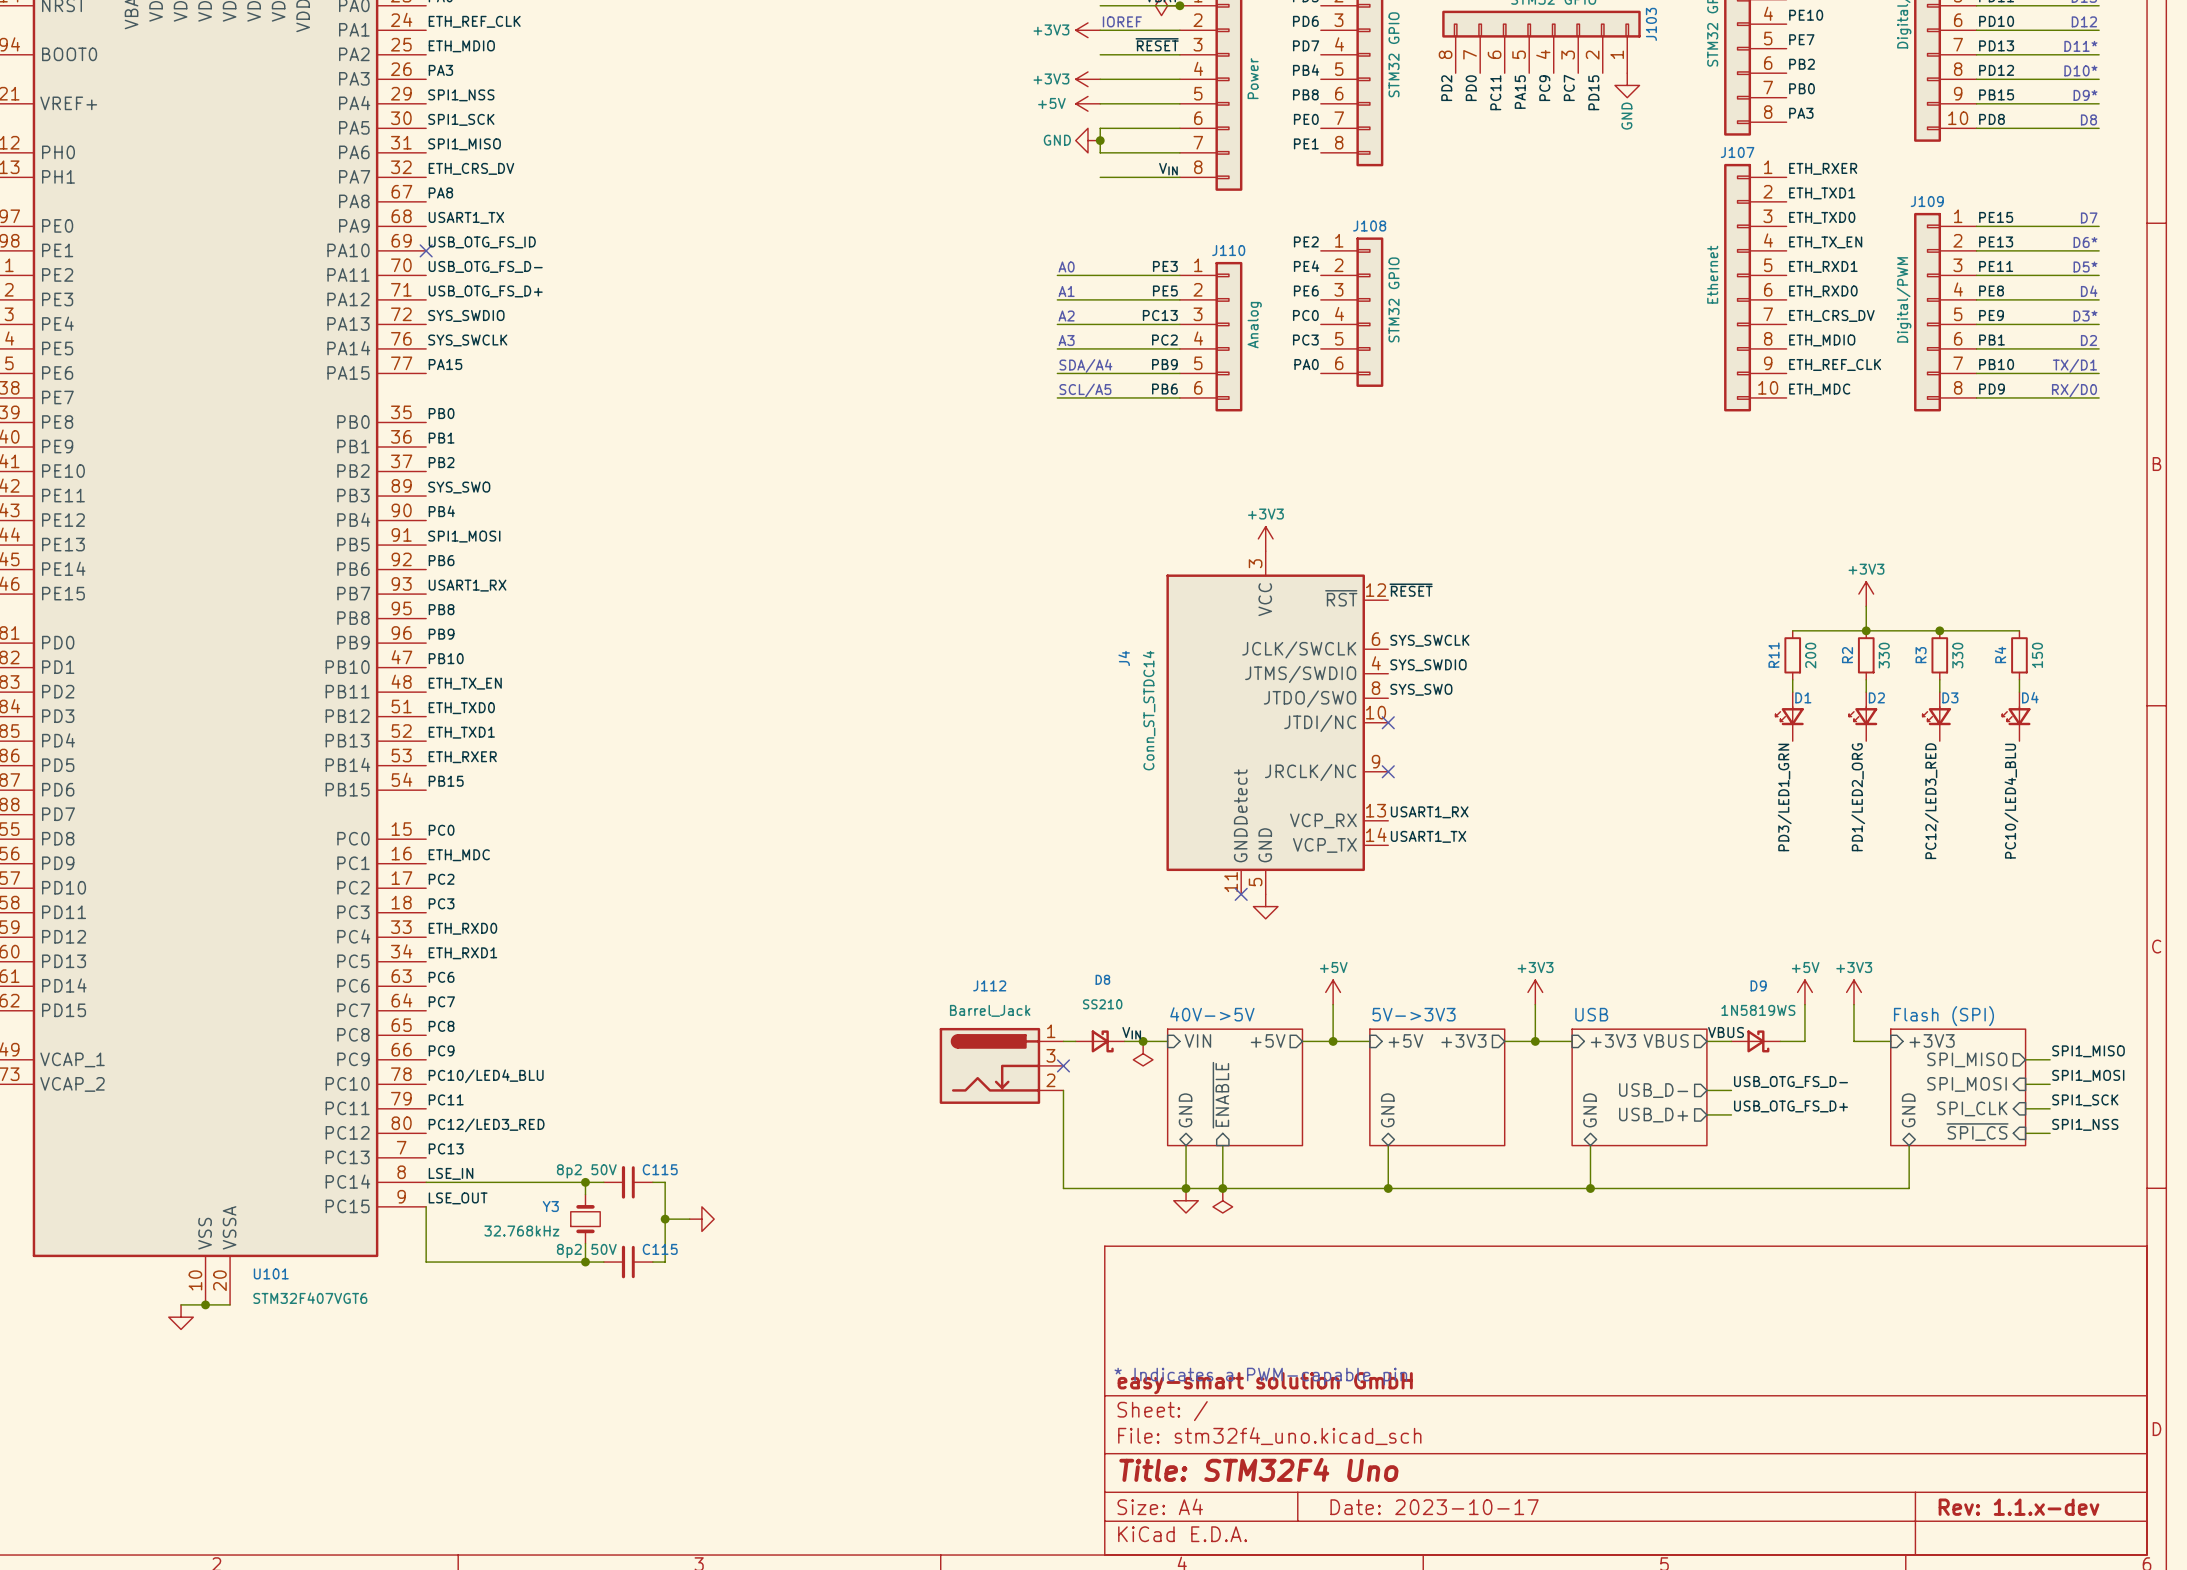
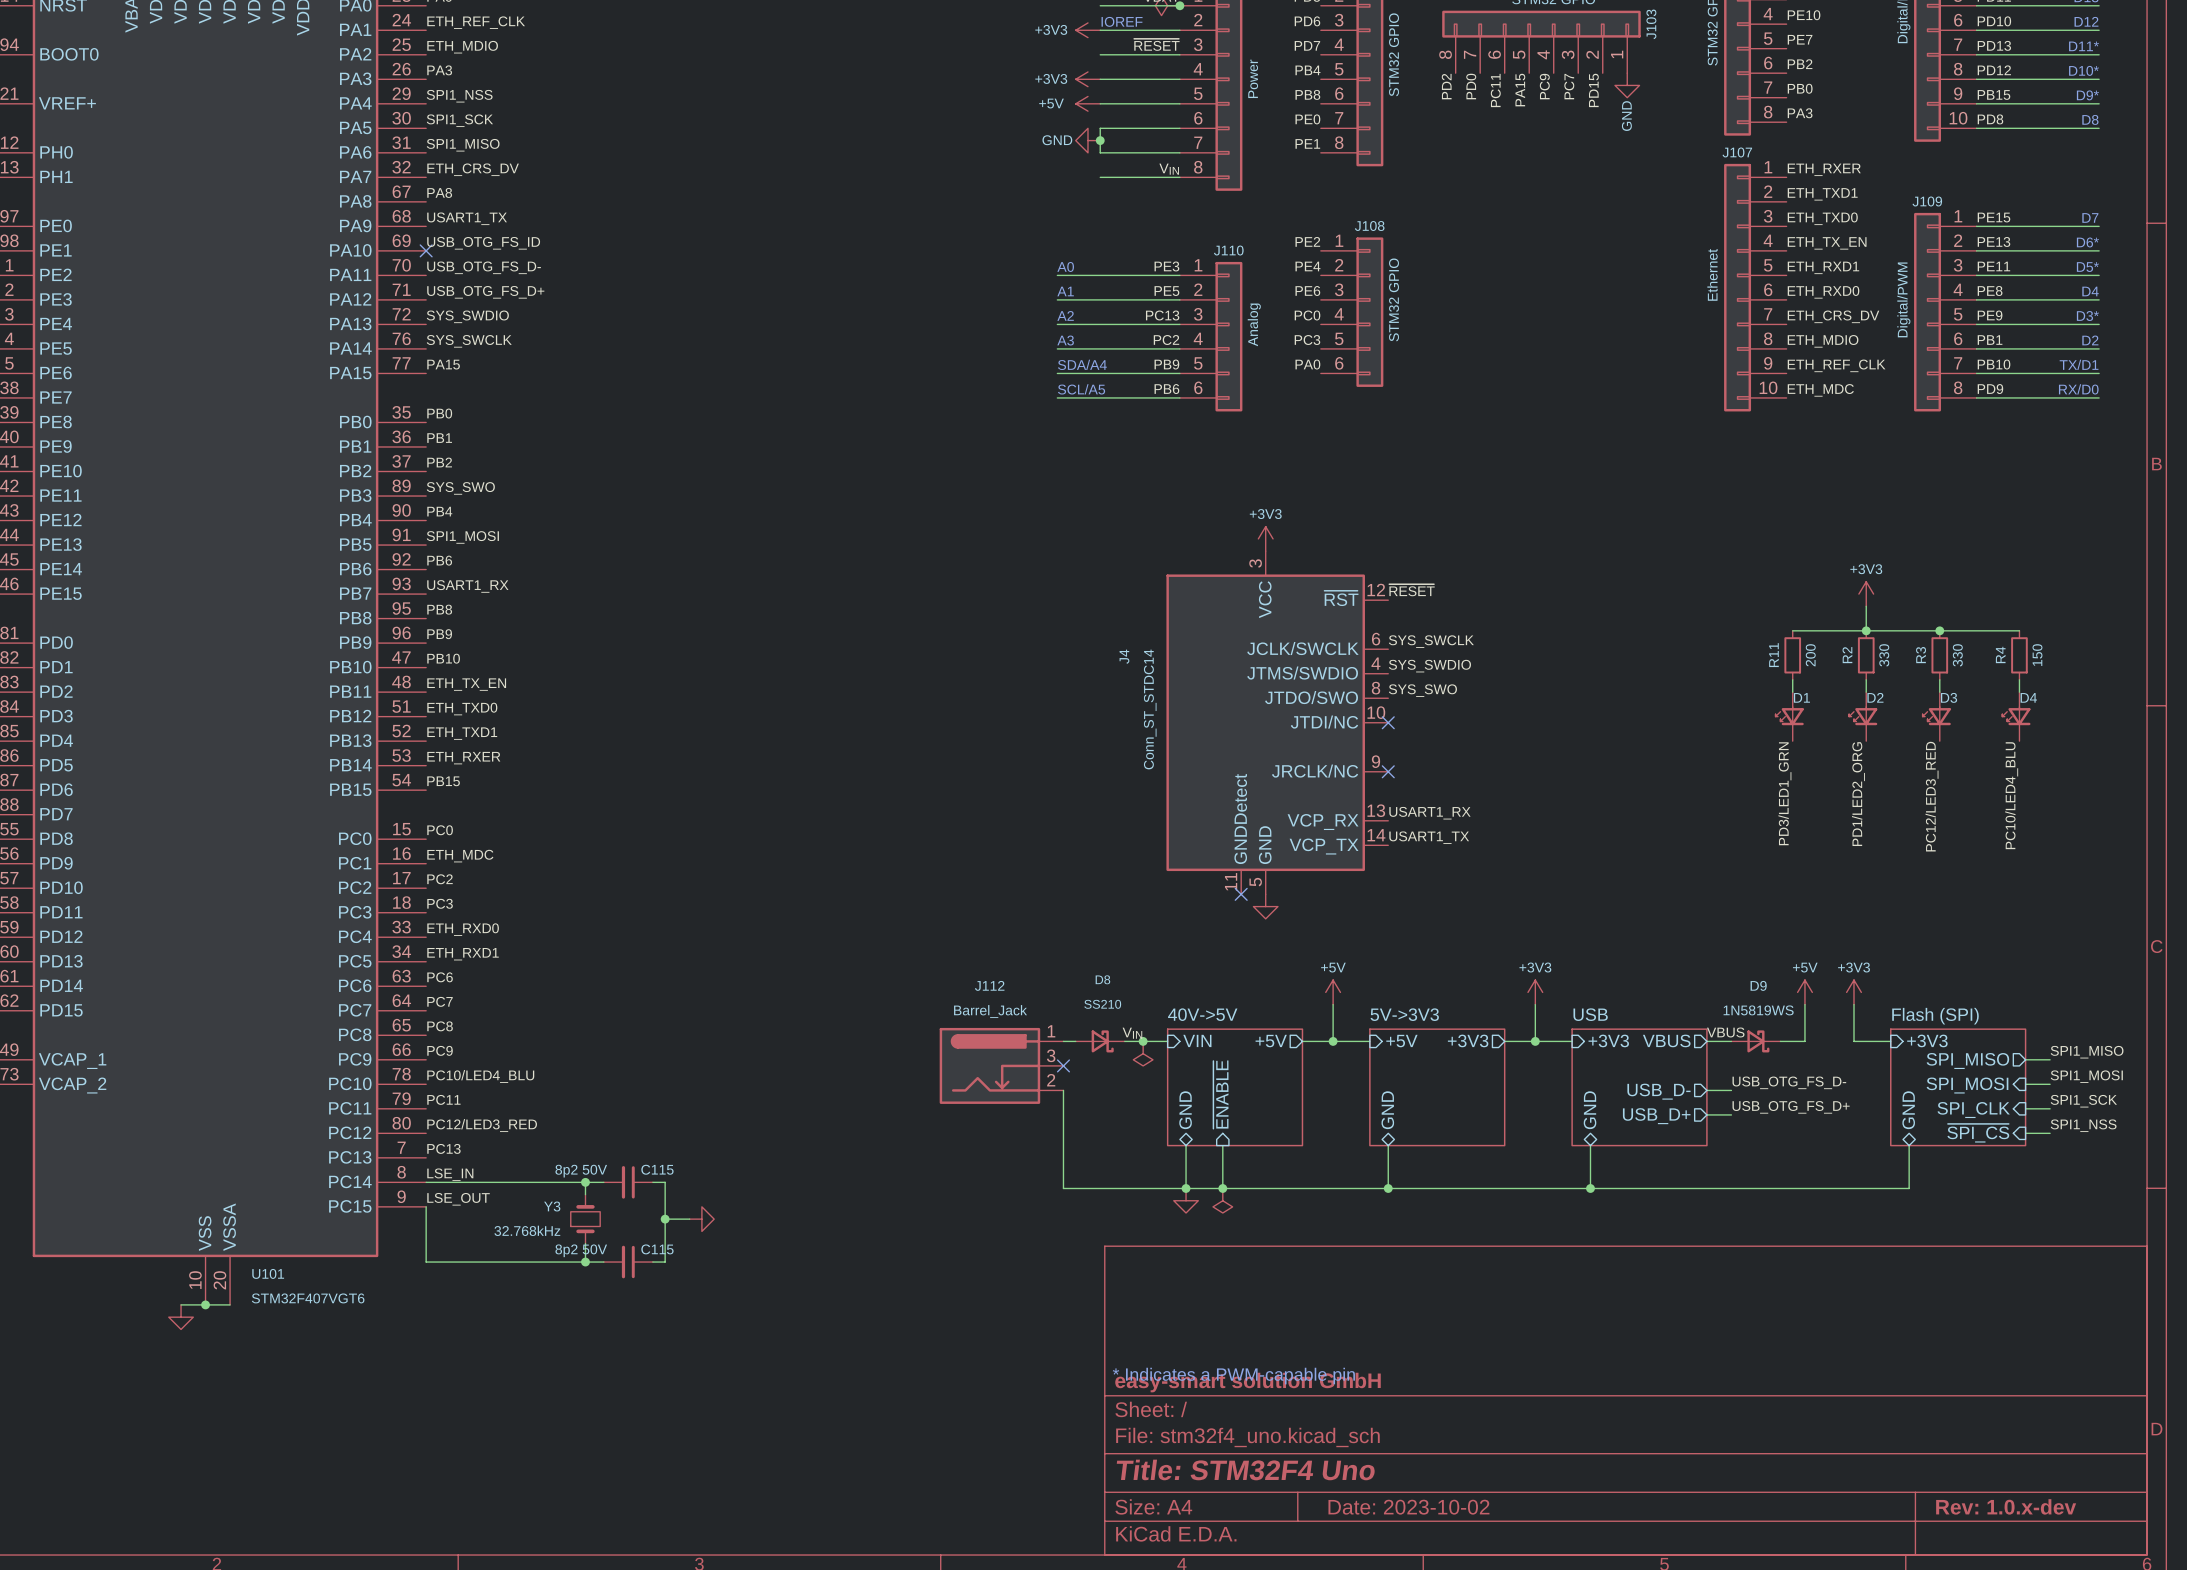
title block: Date: 2023-10-17 (1434, 1507) -> Date: 2023-10-02 (1408, 1507)
title block: Rev: 1.1.x-dev (2019, 1507) -> Rev: 1.0.x-dev (2006, 1506)

